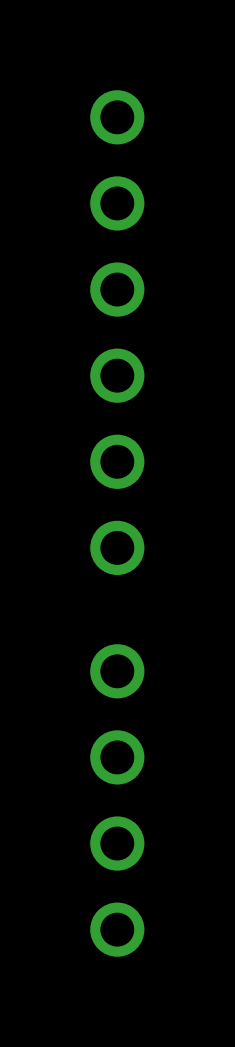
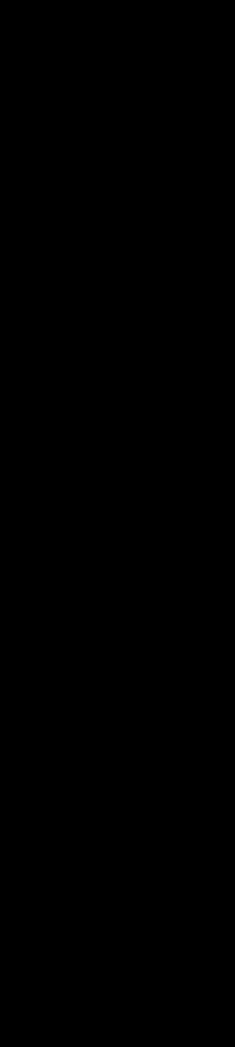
part: (117, 332) -> none
part: (117, 800) -> none

